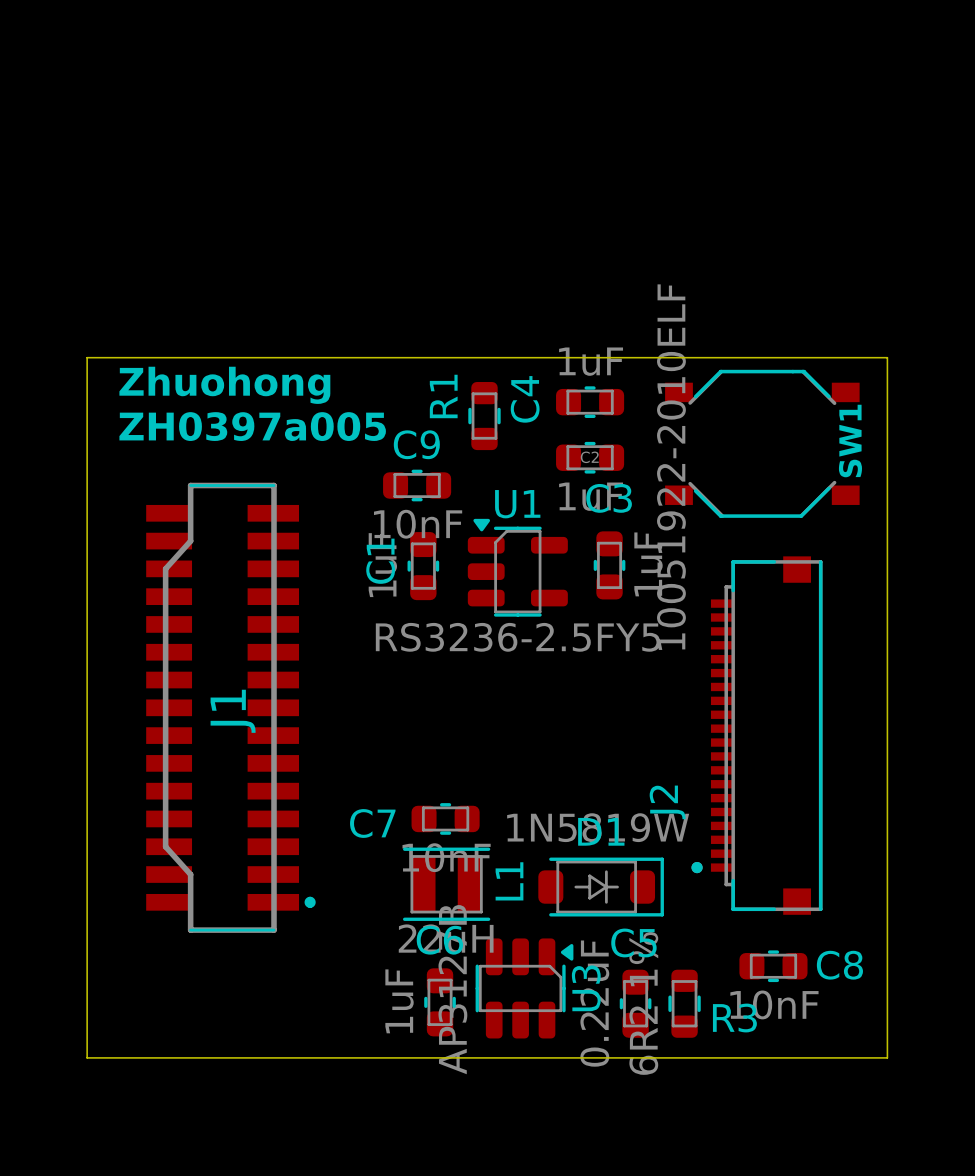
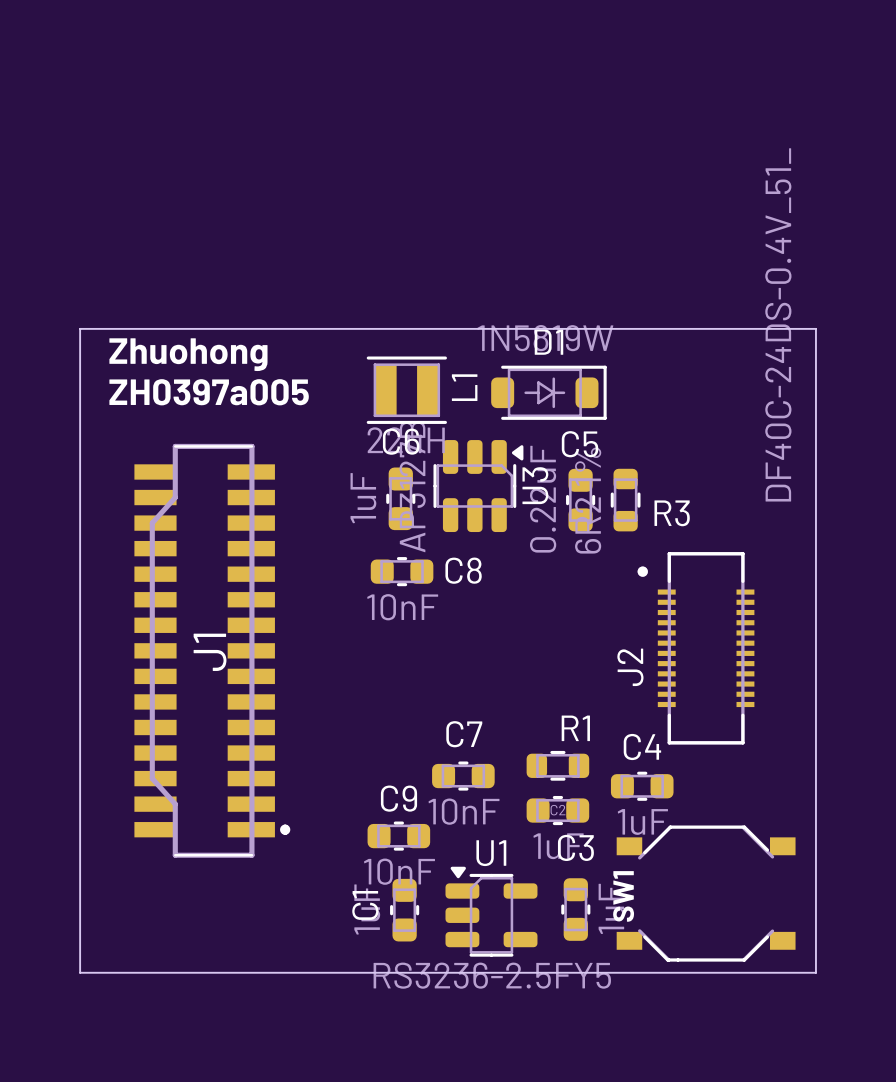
C4 value position: 1uF (591, 361) -> 1uF (642, 821)
C4 name rotation: 0° (525, 399) -> 90° clockwise (642, 746)
C4 name position: C4 (525, 399) -> C4 (642, 746)
C4 position: (590, 402) -> (642, 786)
R1 rotation: 0° (484, 416) -> 90° clockwise (557, 765)
R1 position: (484, 416) -> (557, 765)
SW1 rotation: 0° (762, 443) -> 180° (706, 893)
SW1 position: (762, 443) -> (706, 893)
C2 position: (590, 457) -> (557, 810)
J2 value: 10051922-2010ELF (671, 467) -> DF40C-24DS-0.4V_51_ (778, 324)
C9 position: (417, 485) -> (398, 836)
J2 footprint: [691, 556, 823, 915] -> [637, 552, 755, 745]
C3 position: (609, 565) -> (575, 909)
C1 position: (423, 566) -> (404, 910)
U1 position: (517, 567) -> (491, 911)
C7 position: (445, 818) -> (463, 776)
C7 name position: C7 (372, 823) -> C7 (464, 734)
L1 position: (446, 884) -> (406, 390)
D1 position: (601, 887) -> (548, 392)
C8 position: (773, 966) -> (402, 571)
U3 position: (524, 988) -> (478, 486)
C6 position: (440, 1002) -> (400, 498)
C5 position: (635, 1003) -> (580, 500)
R3 position: (684, 1003) -> (625, 500)

